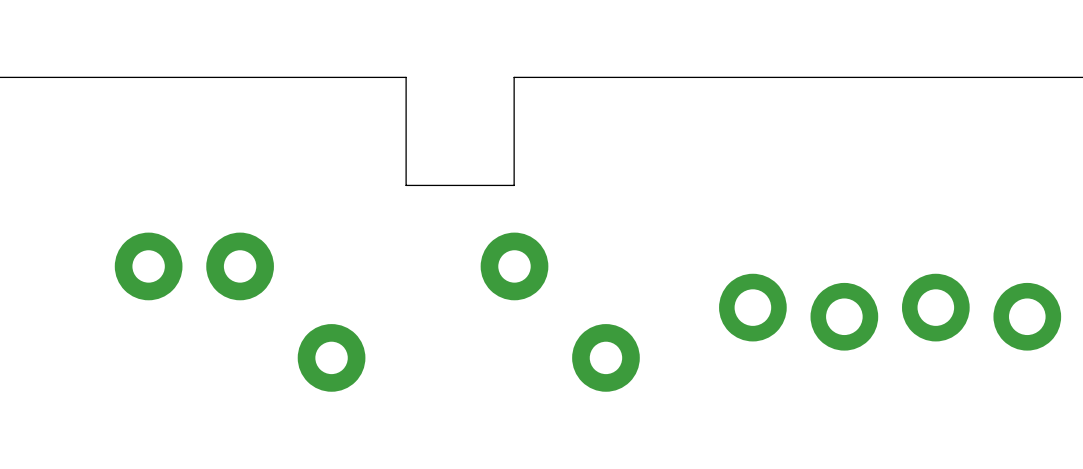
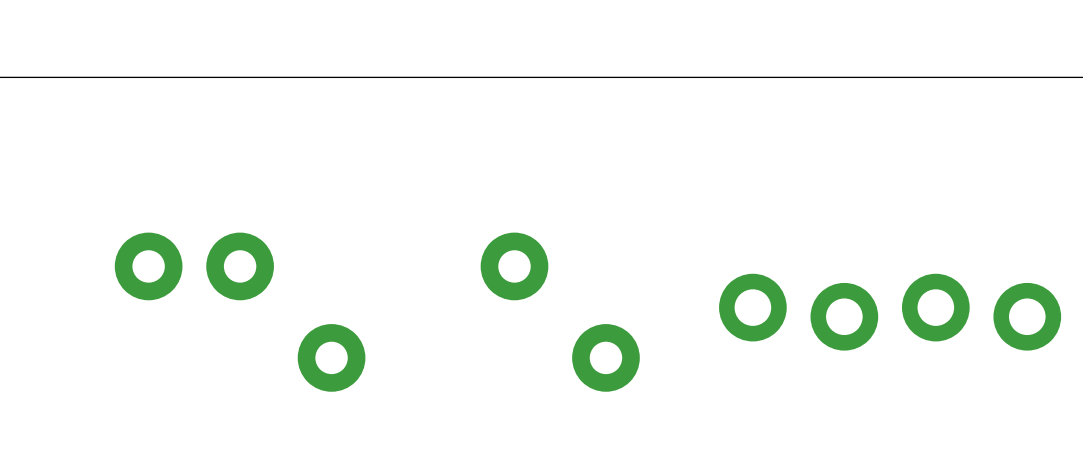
board edge: (514, 77) (514, 185) (406, 185) (406, 77) -> (514, 77) (406, 77)

